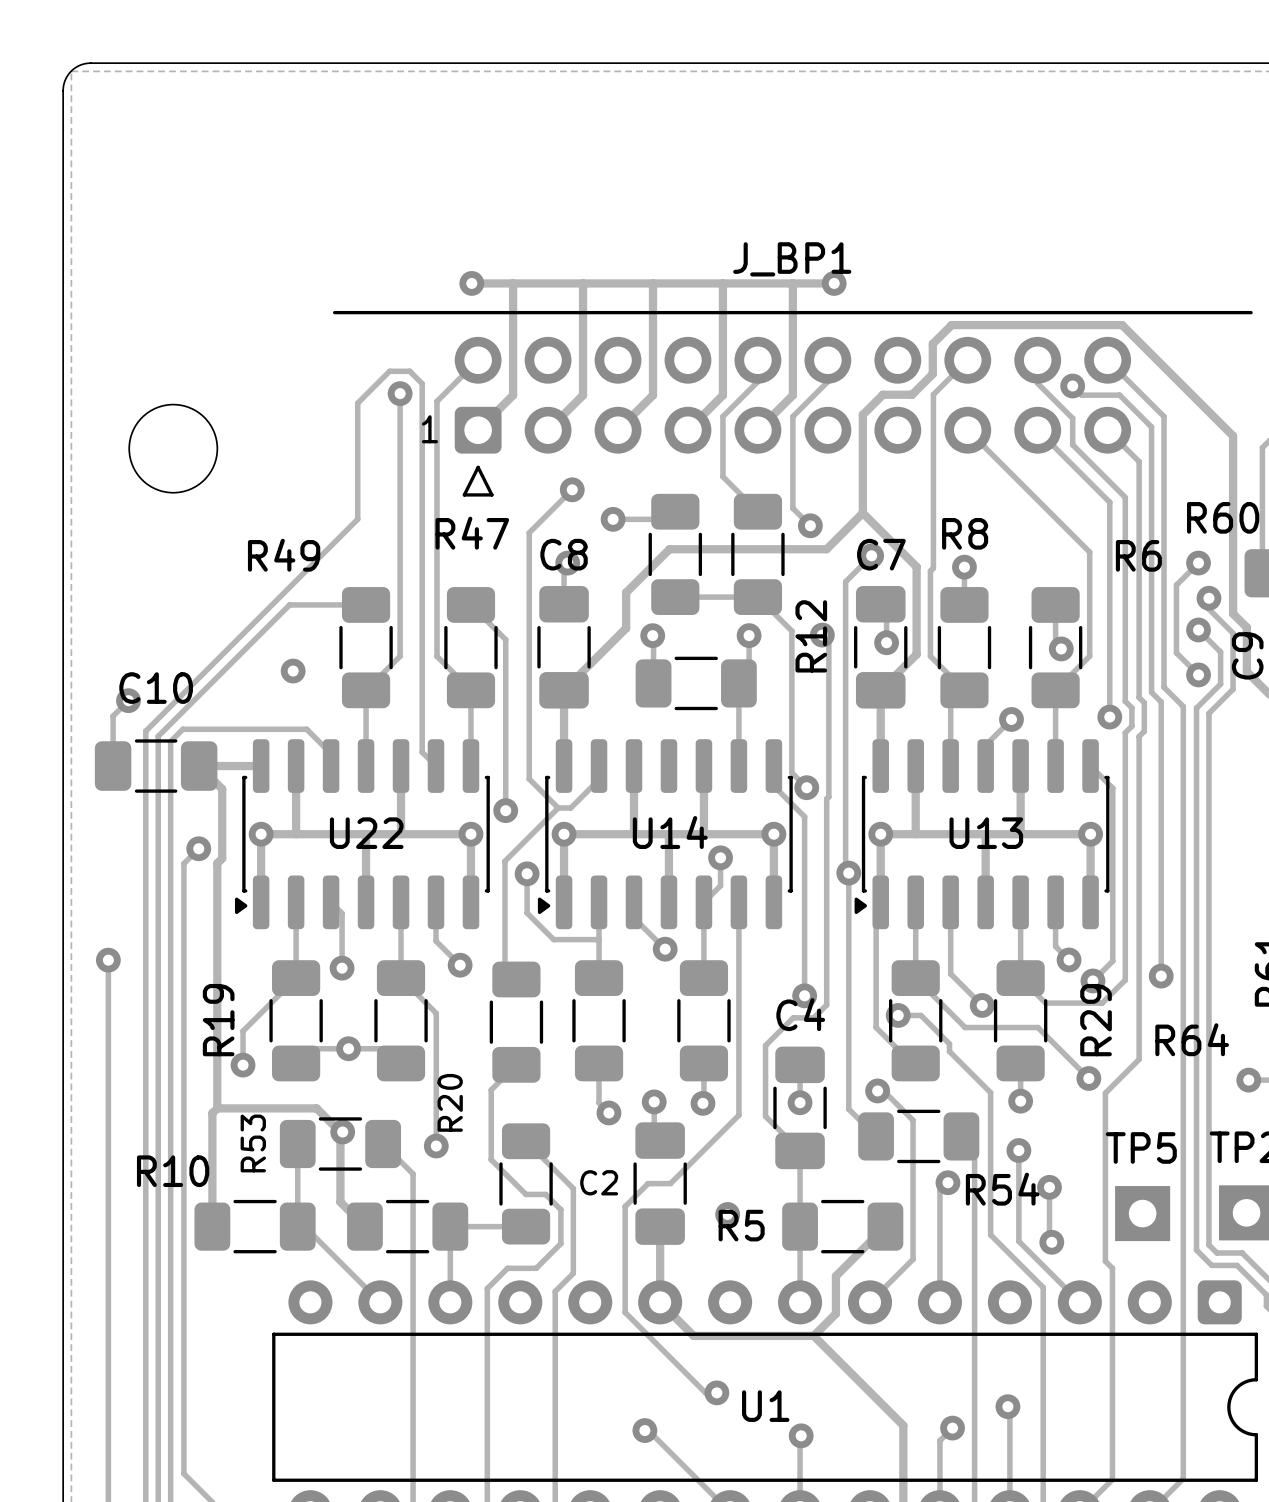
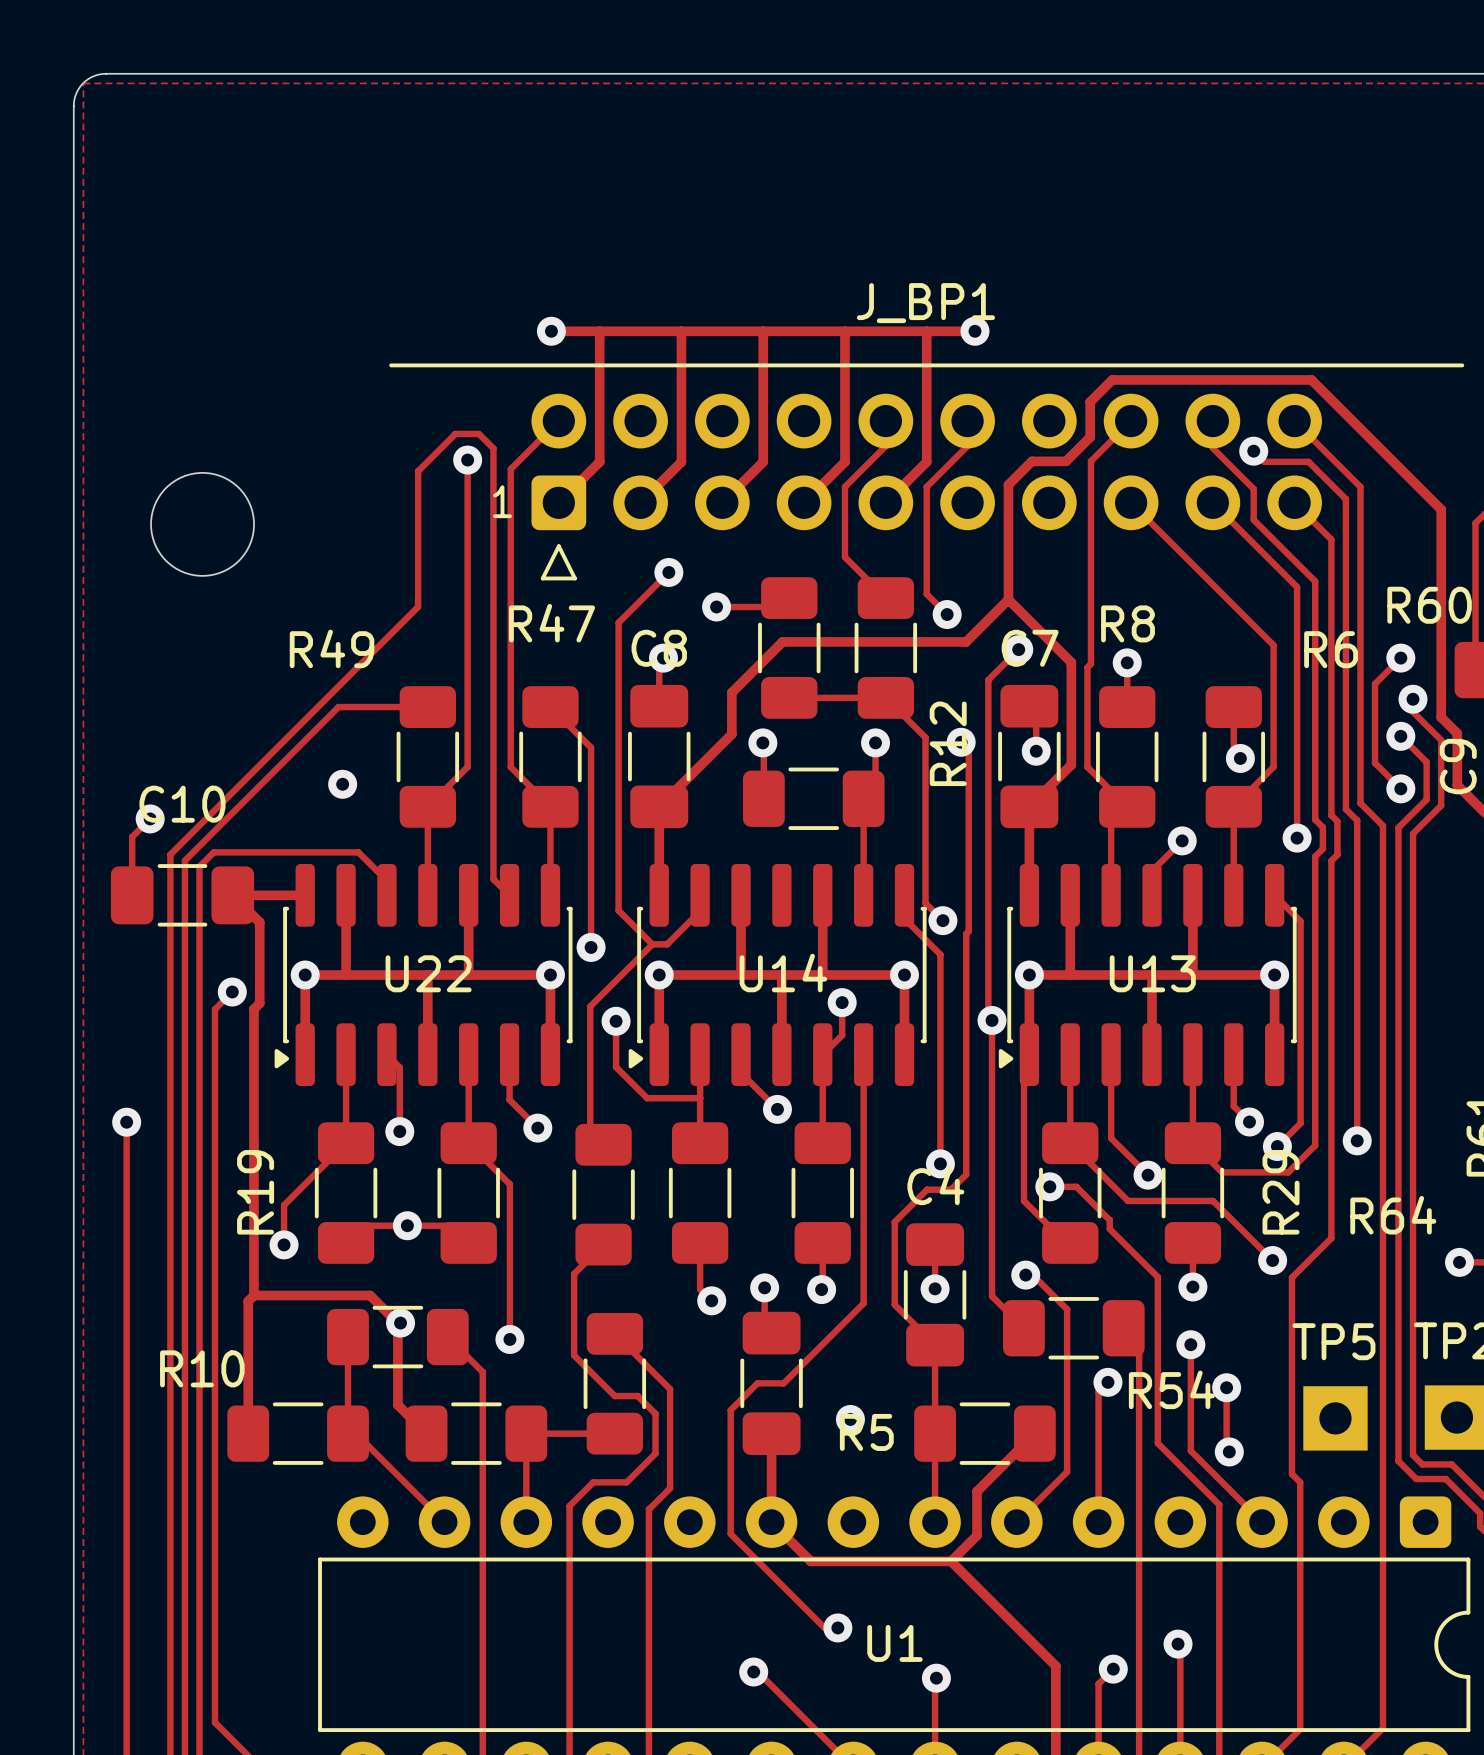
R20 name: R20 (450, 1102) -> none
R53 name: R53 (253, 1143) -> none
C2 name: C2 (599, 1182) -> none

